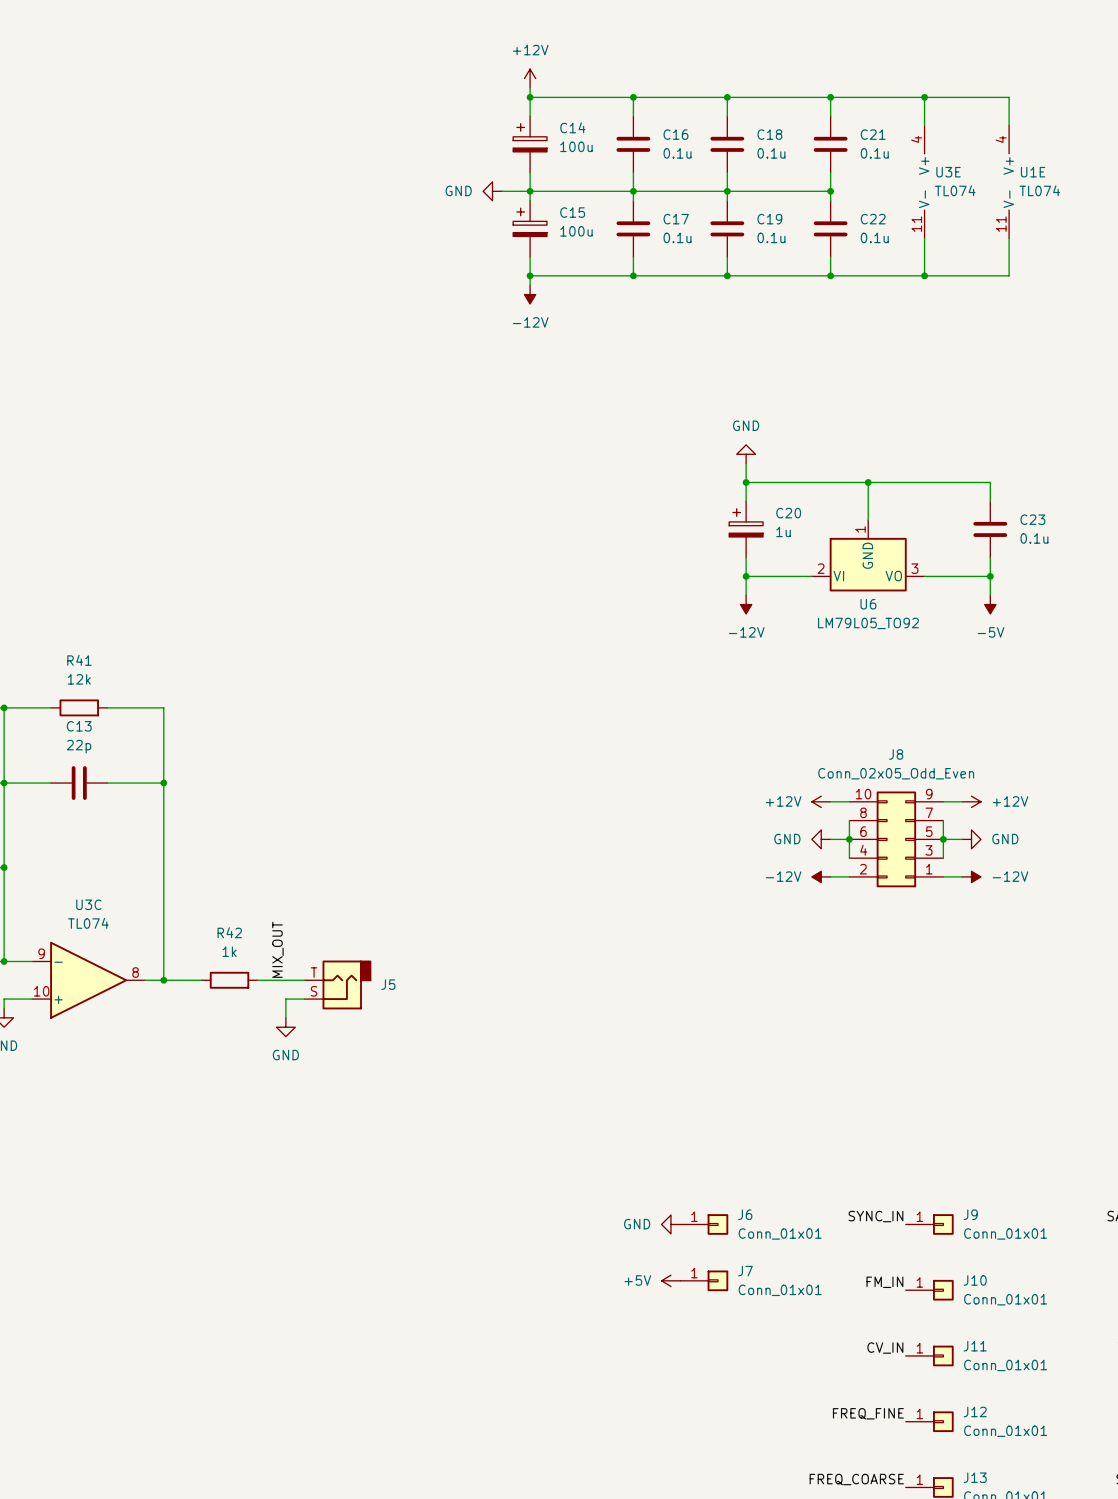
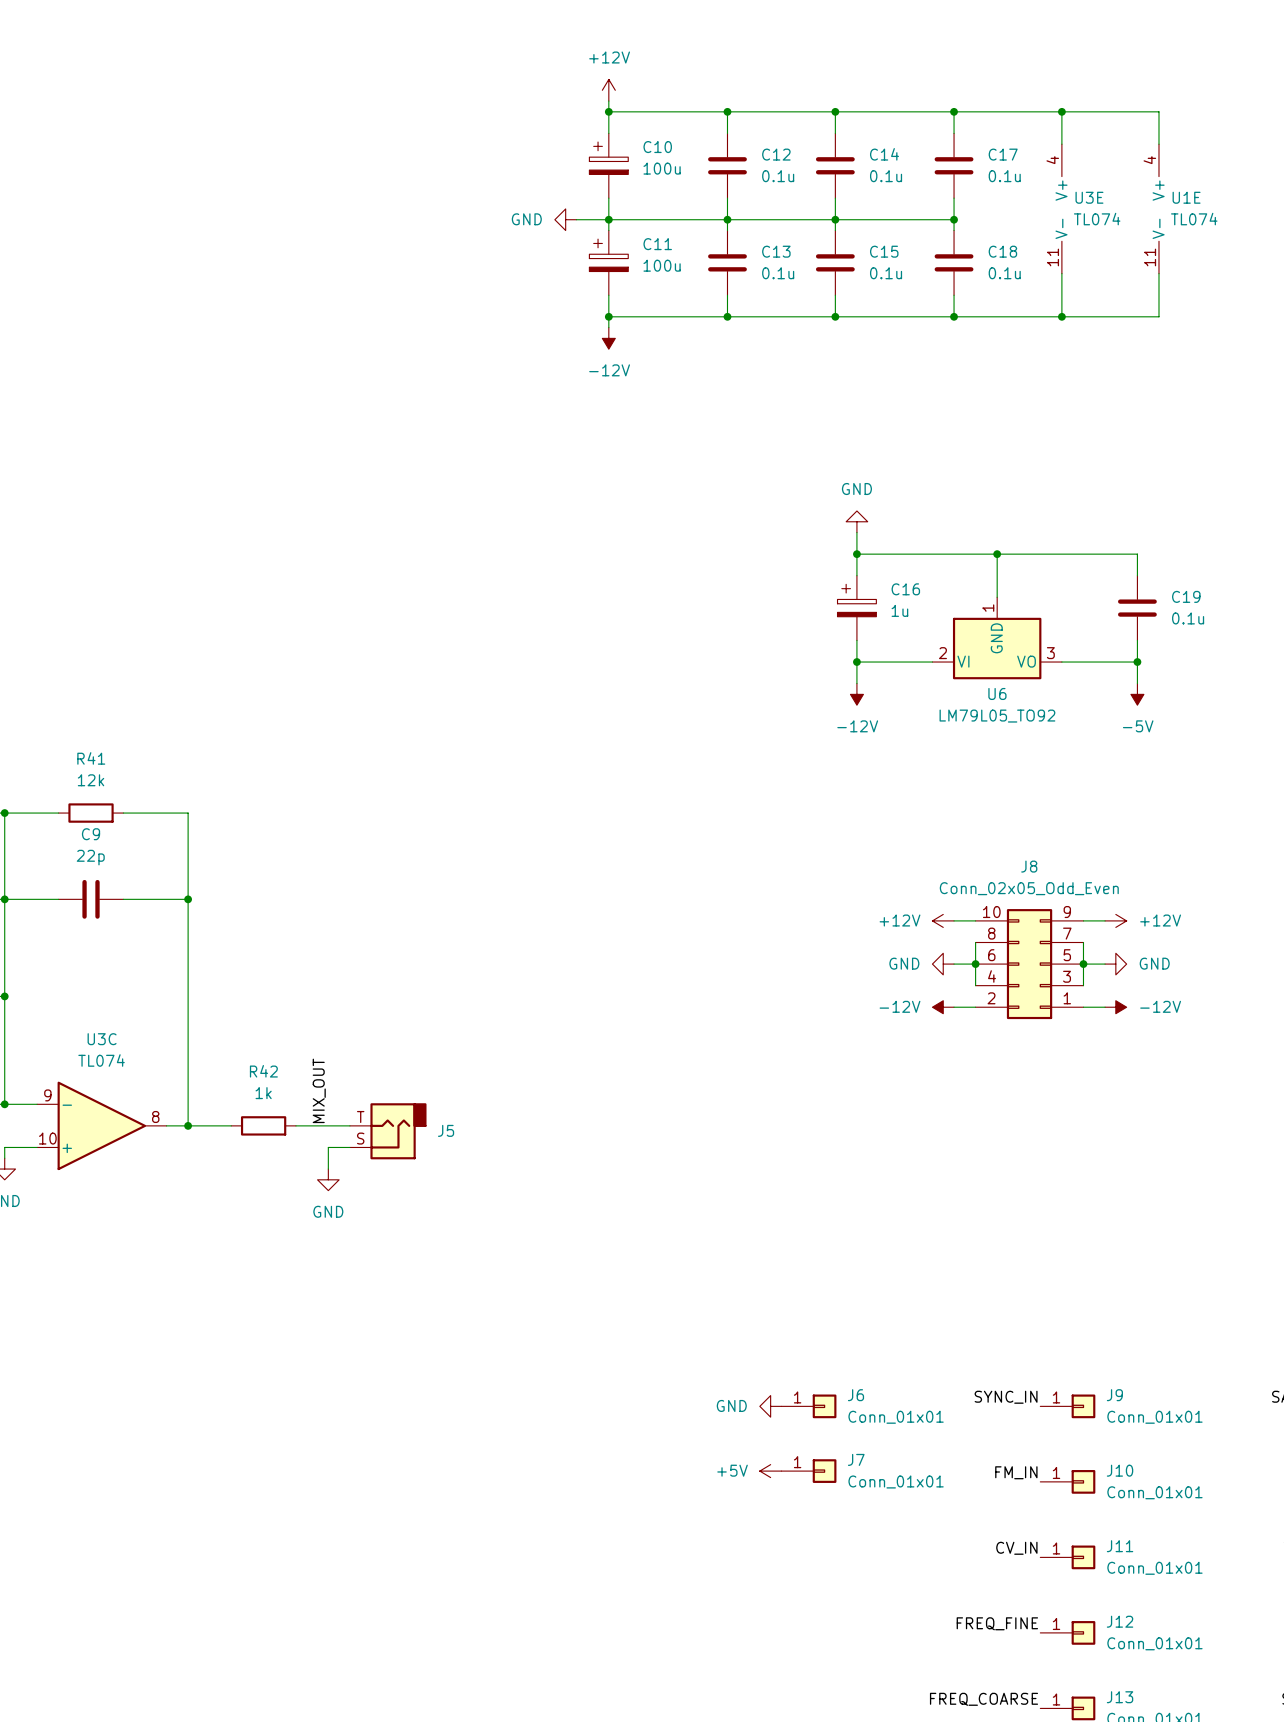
C14 name: C14 (572, 127) -> C10 (657, 147)
C16 name: C16 (675, 134) -> C12 (776, 154)
C18 name: C18 (769, 134) -> C14 (884, 154)
C21 name: C21 (873, 134) -> C17 (1003, 154)
C15 name: C15 (572, 212) -> C11 (657, 244)
C17 name: C17 (676, 219) -> C13 (776, 251)
C19 name: C19 (769, 219) -> C15 (884, 251)
C22 name: C22 (873, 219) -> C18 (1002, 251)
C20 name: C20 (788, 513) -> C16 (905, 589)
C23 name: C23 (1032, 519) -> C19 (1186, 596)
C13 name: C13 (79, 726) -> C9 (91, 834)

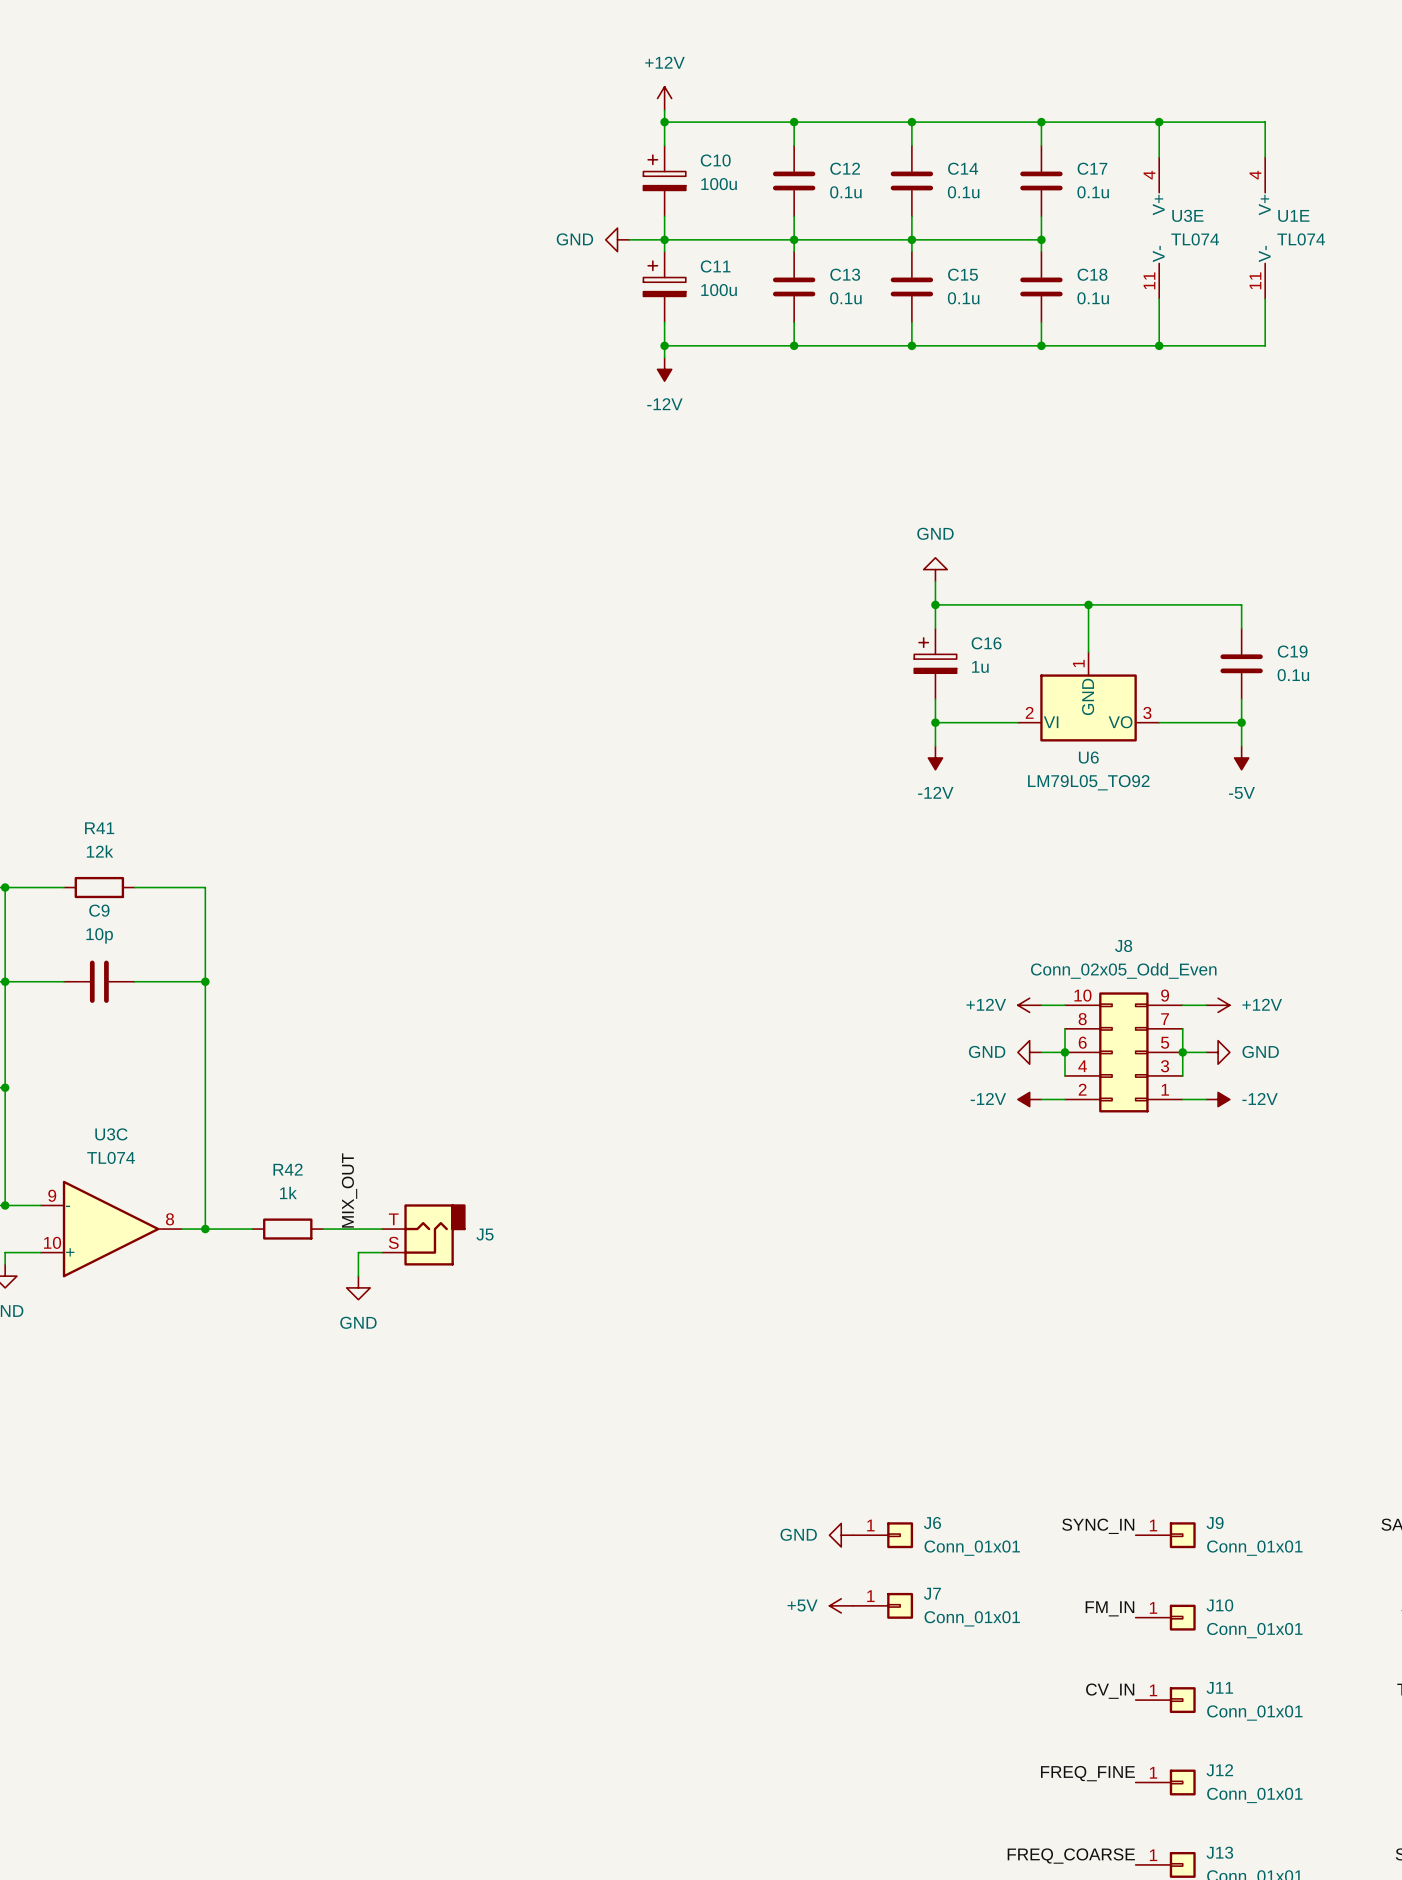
C9 value: 22p (90, 857) -> 10p (99, 935)

